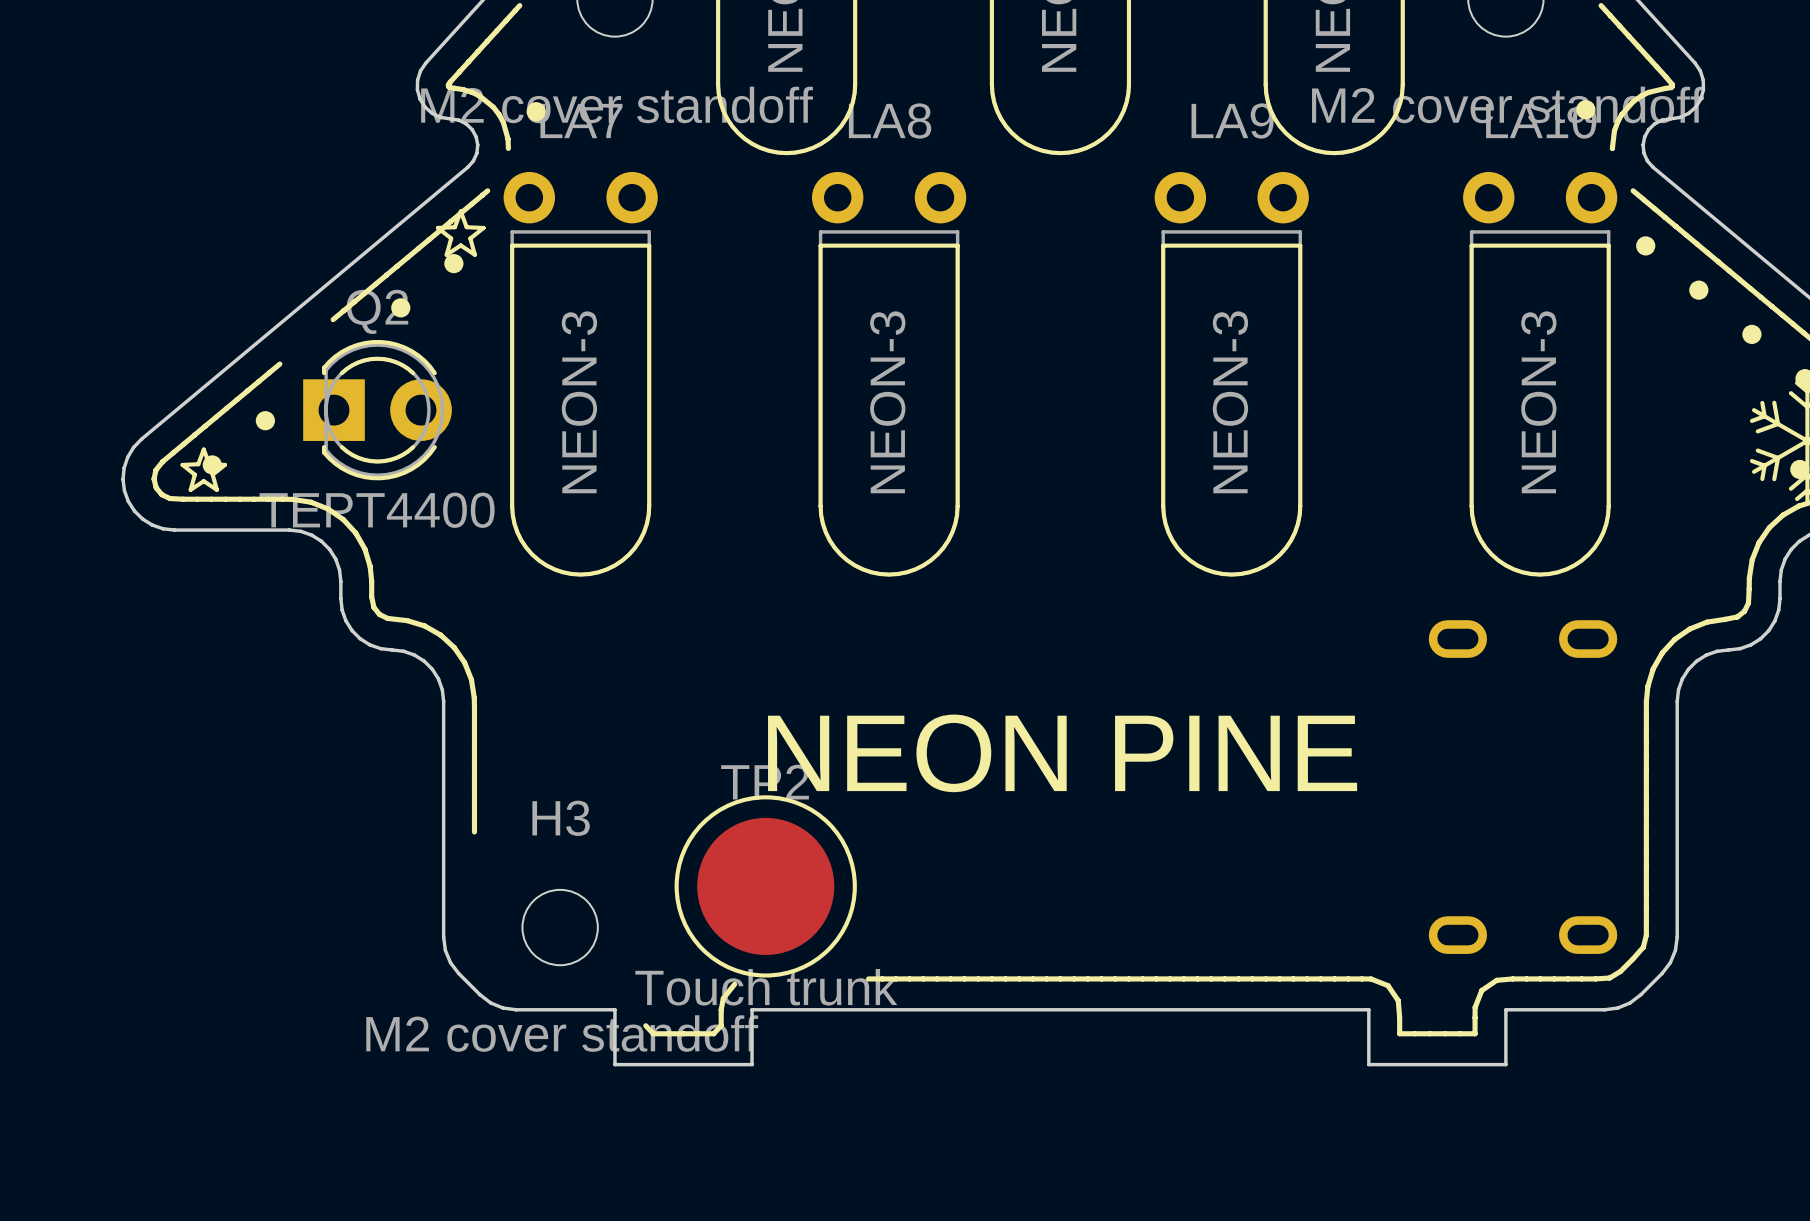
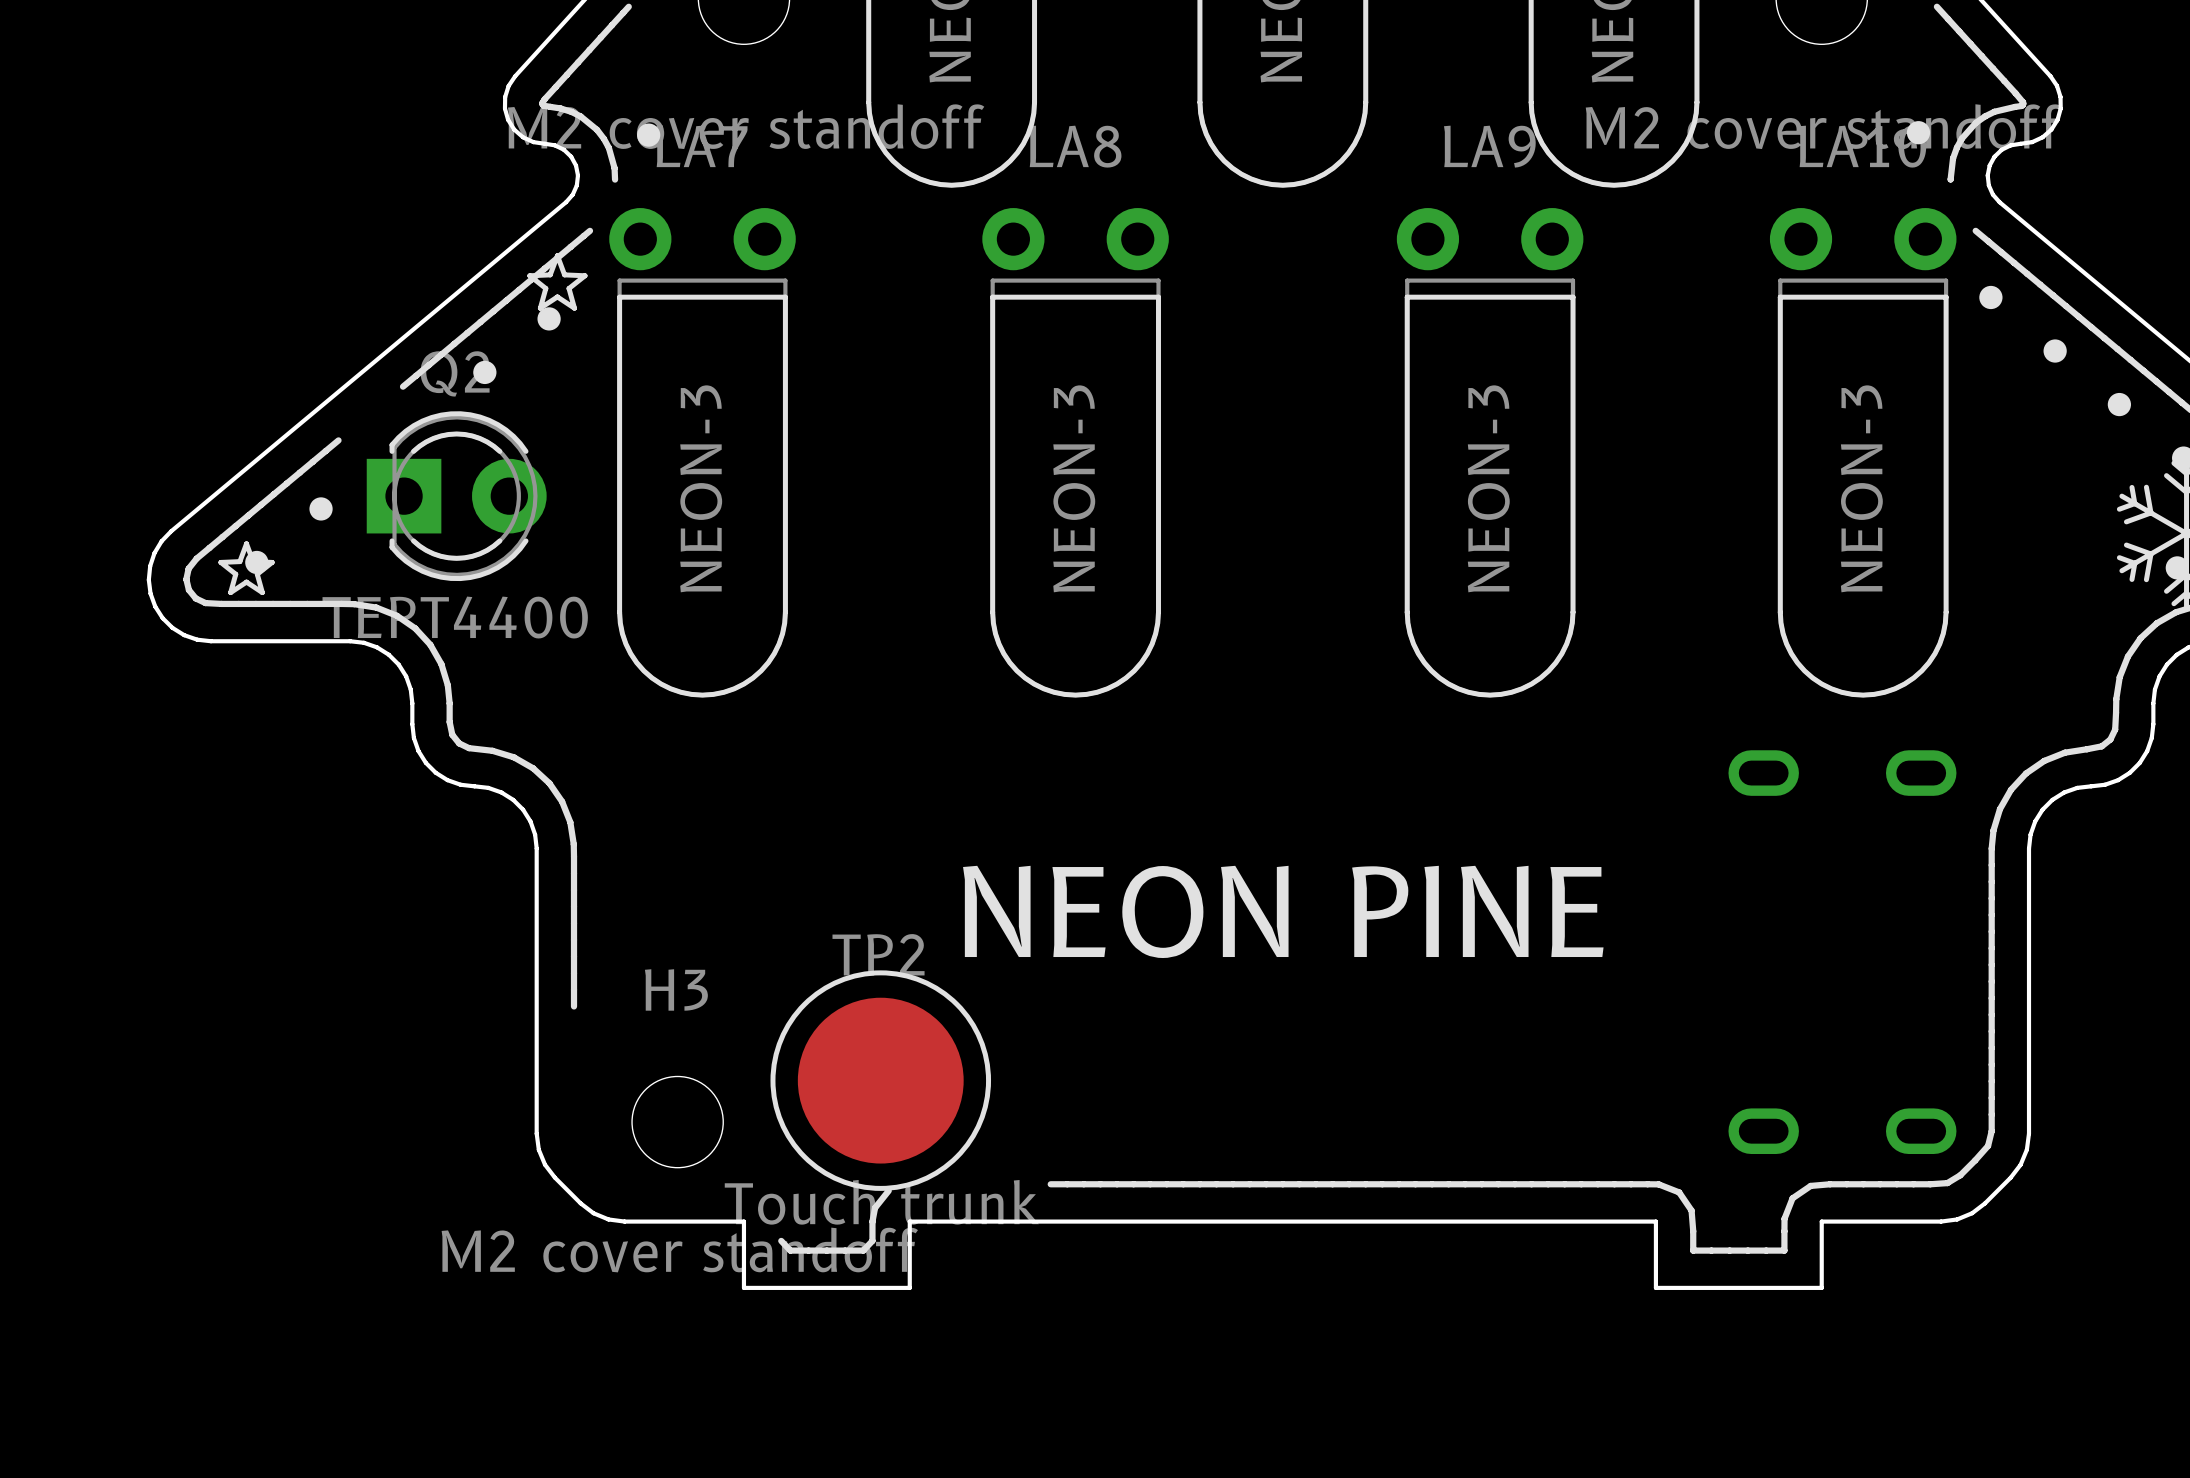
TP2 position: (765, 886) -> (880, 1080)

